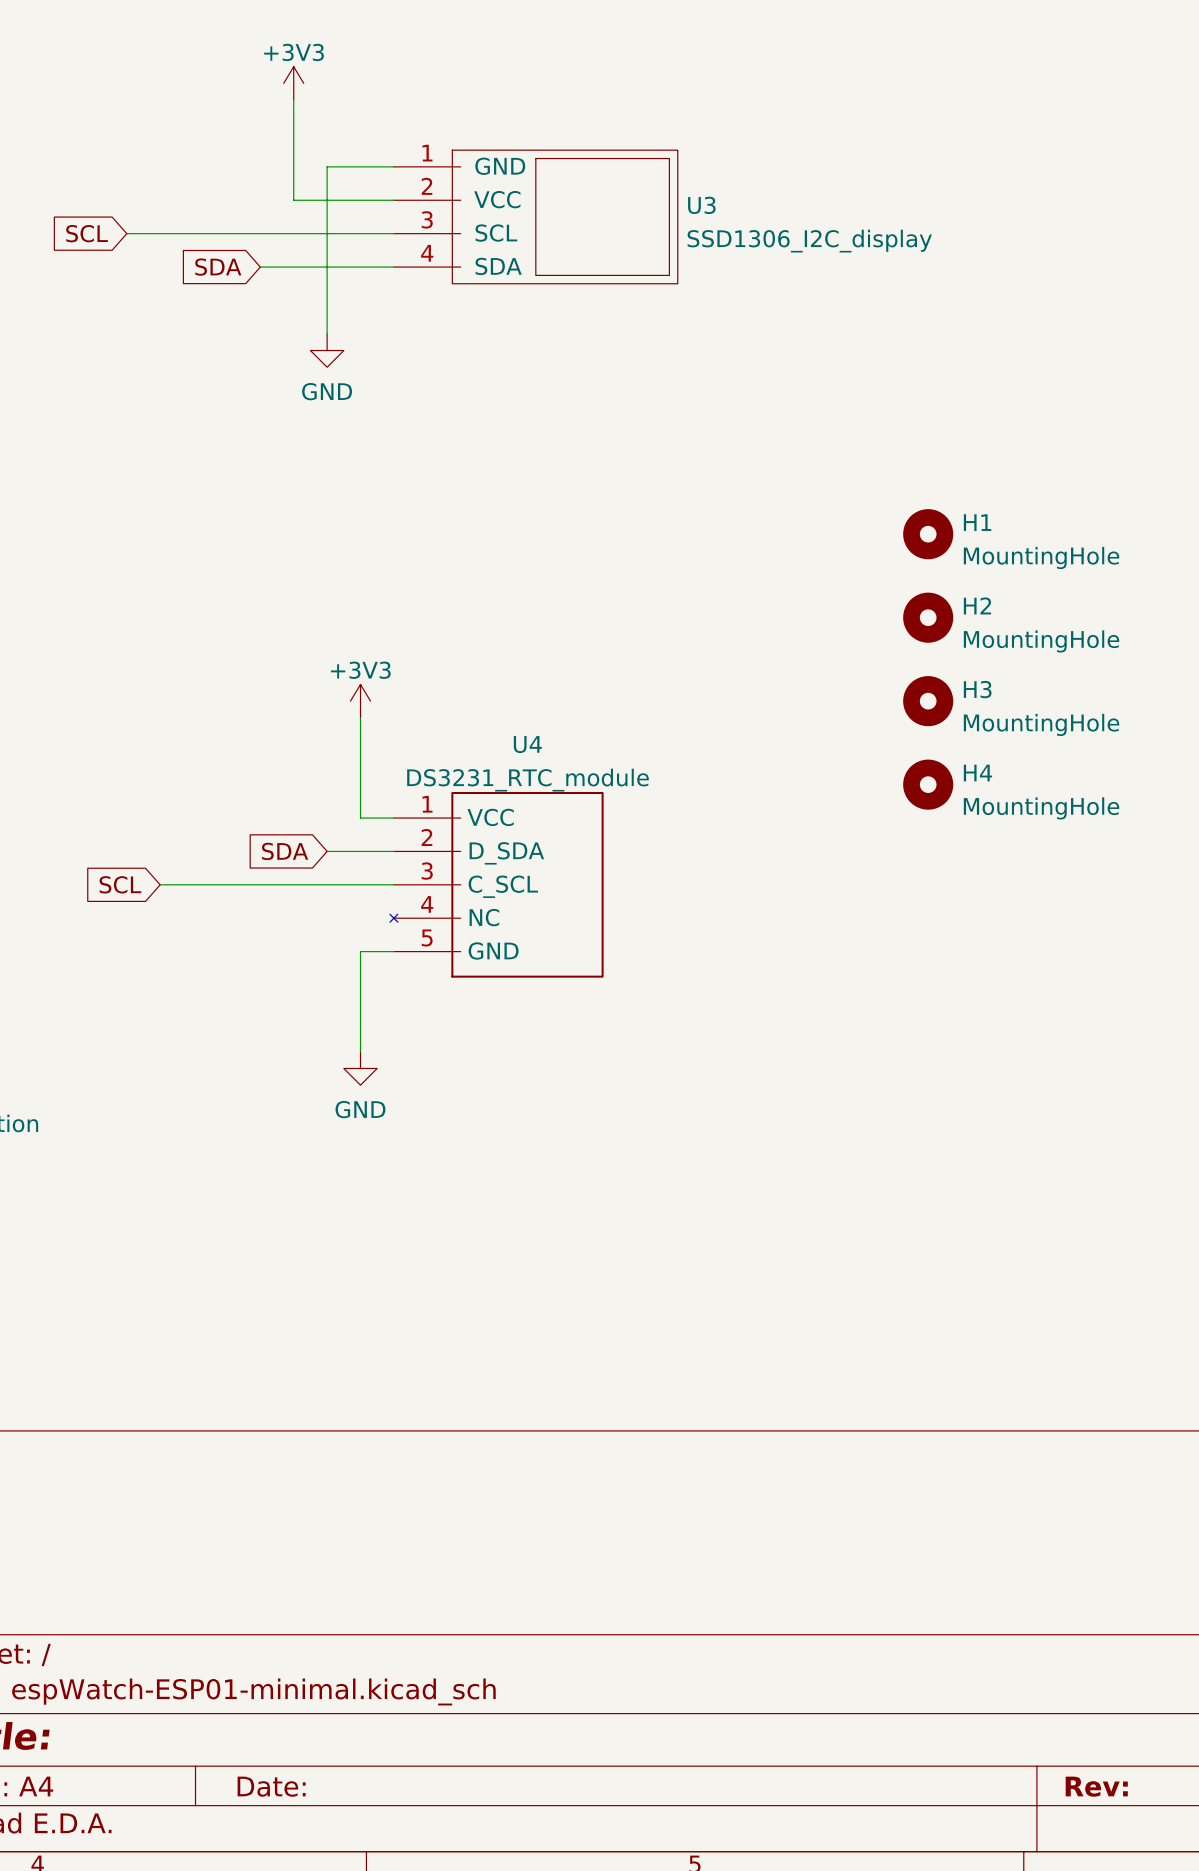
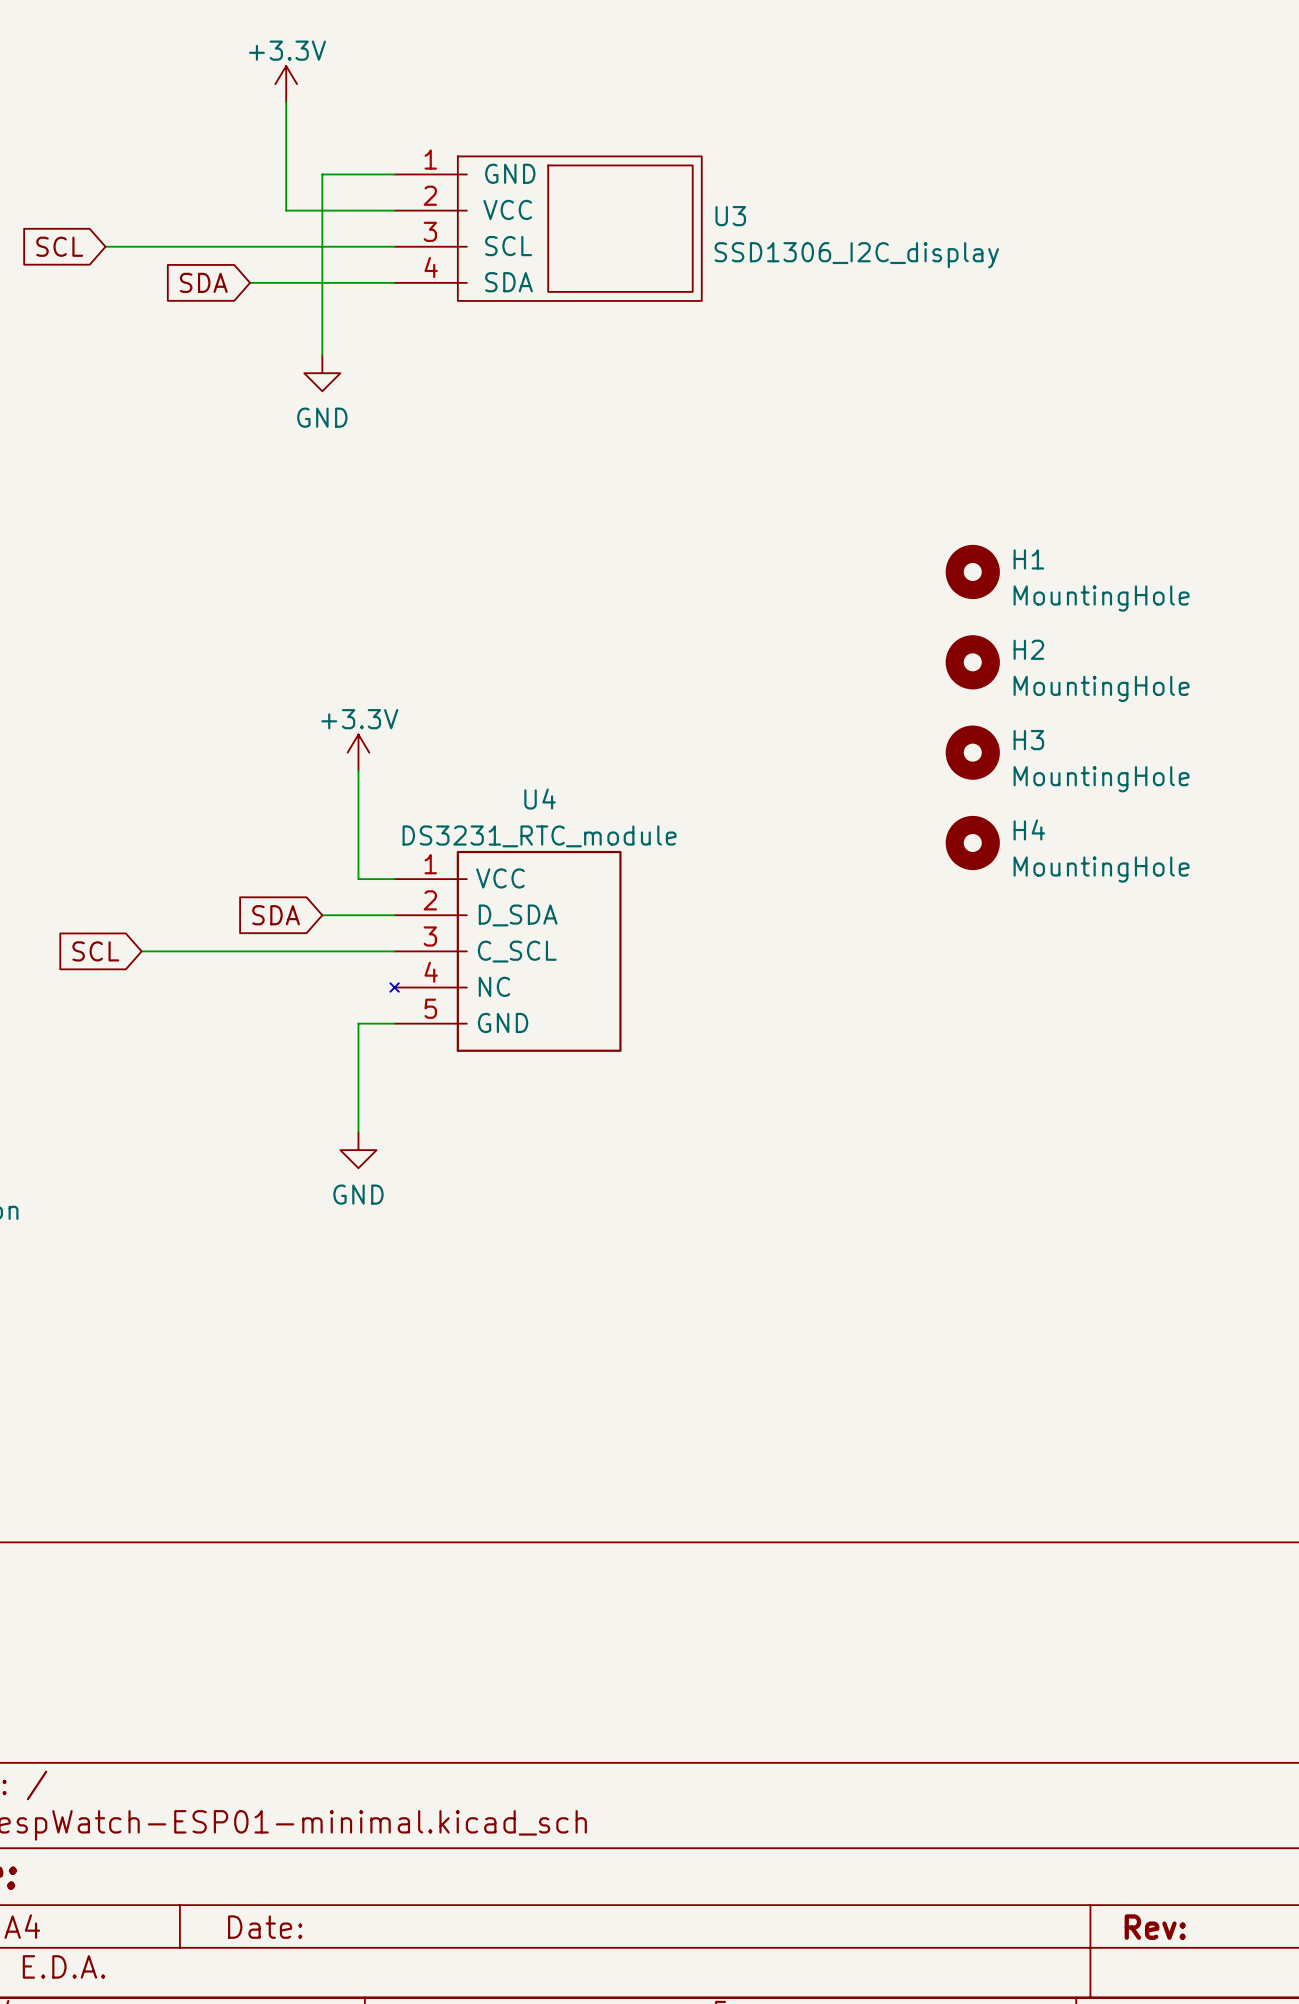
power symbol: +3V3 (293, 83) -> +3.3V (286, 84)
power symbol: +3V3 (360, 701) -> +3.3V (358, 752)

